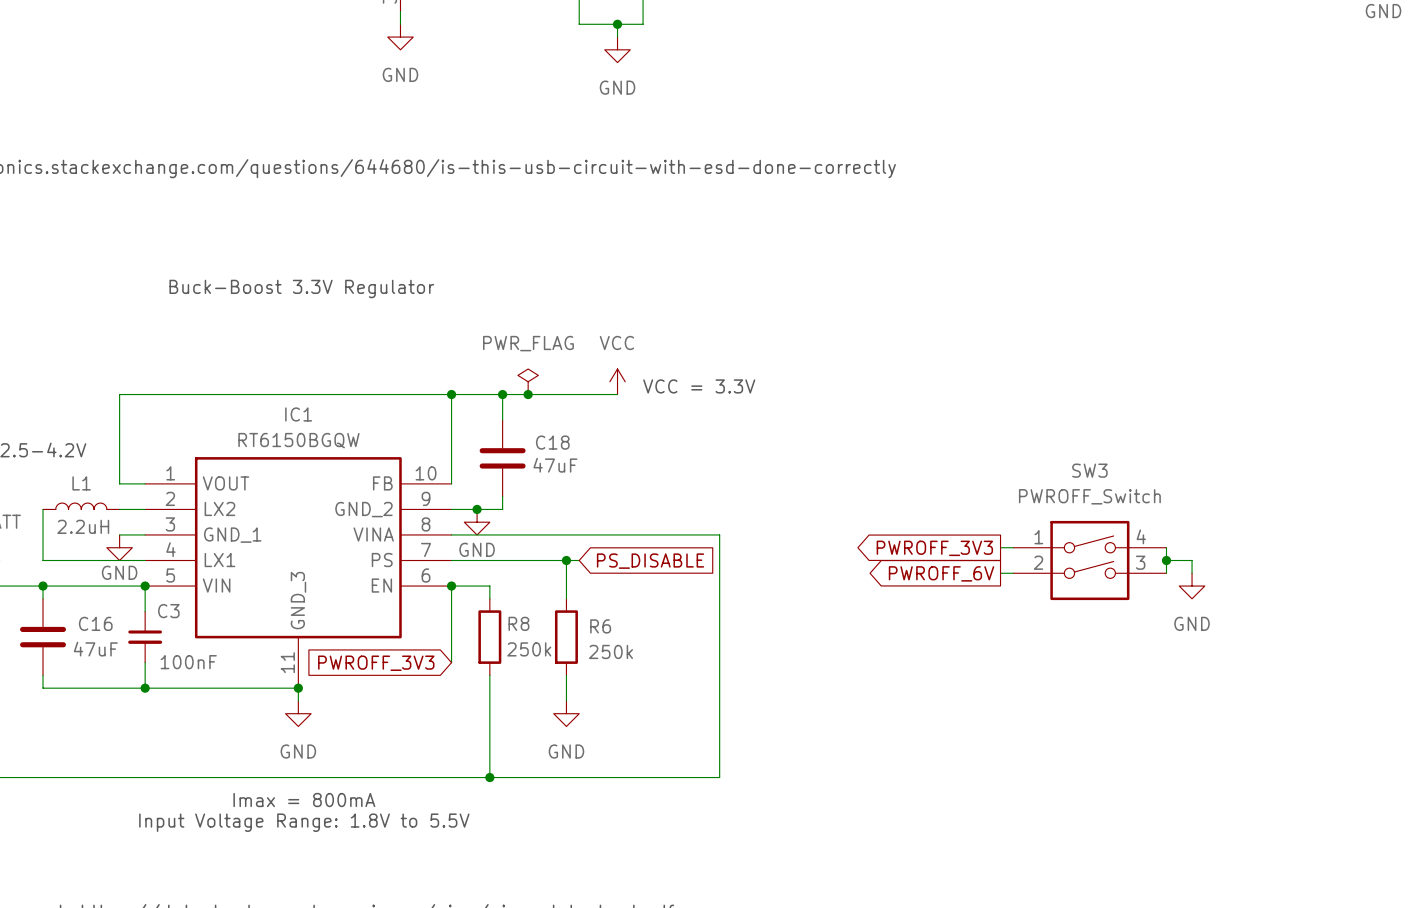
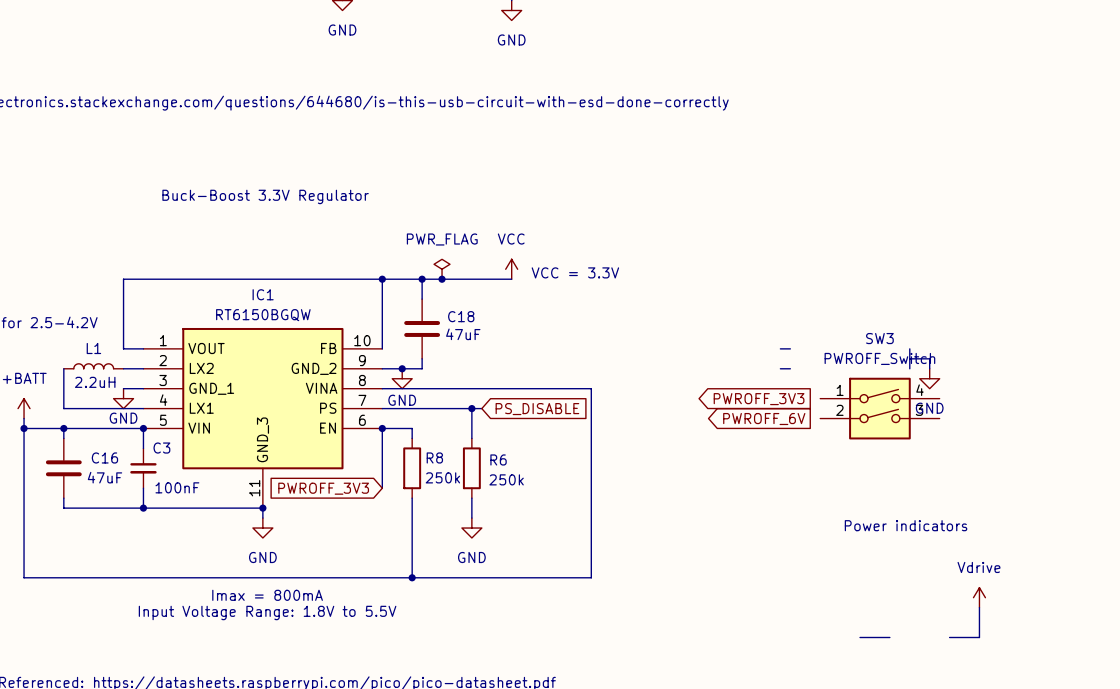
wire: (1000, 547) (1013, 547) -> (780, 348) (790, 348)
wire: (1166, 547) (1166, 573) -> (909, 348) (909, 368)
wire: (1166, 560) (1192, 560) (1192, 573) -> (909, 358) (929, 358) (929, 368)
junction: (1166, 560) -> none
wire: (1000, 573) (1013, 573) -> (780, 368) (790, 368)
power symbol position: GND (1192, 586) -> GND (929, 378)
text: none -> Power indicators (906, 525)
power symbol: none -> Vdrive (979, 597)
wire: none -> (979, 607) (979, 637) (949, 637)
wire: none -> (860, 637) (889, 637)

